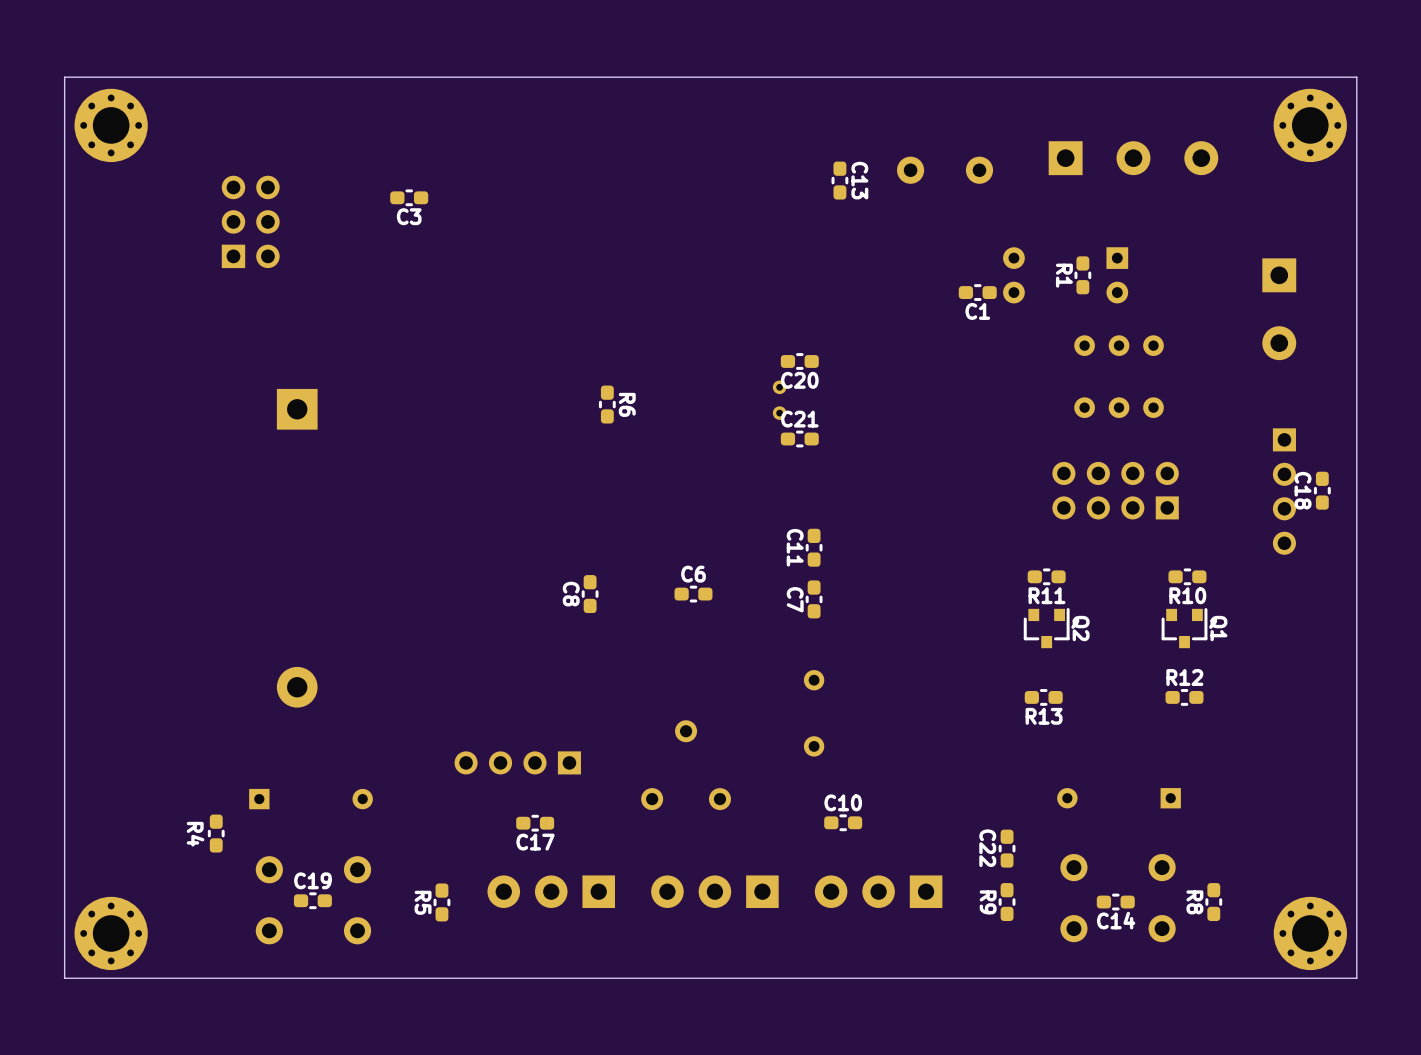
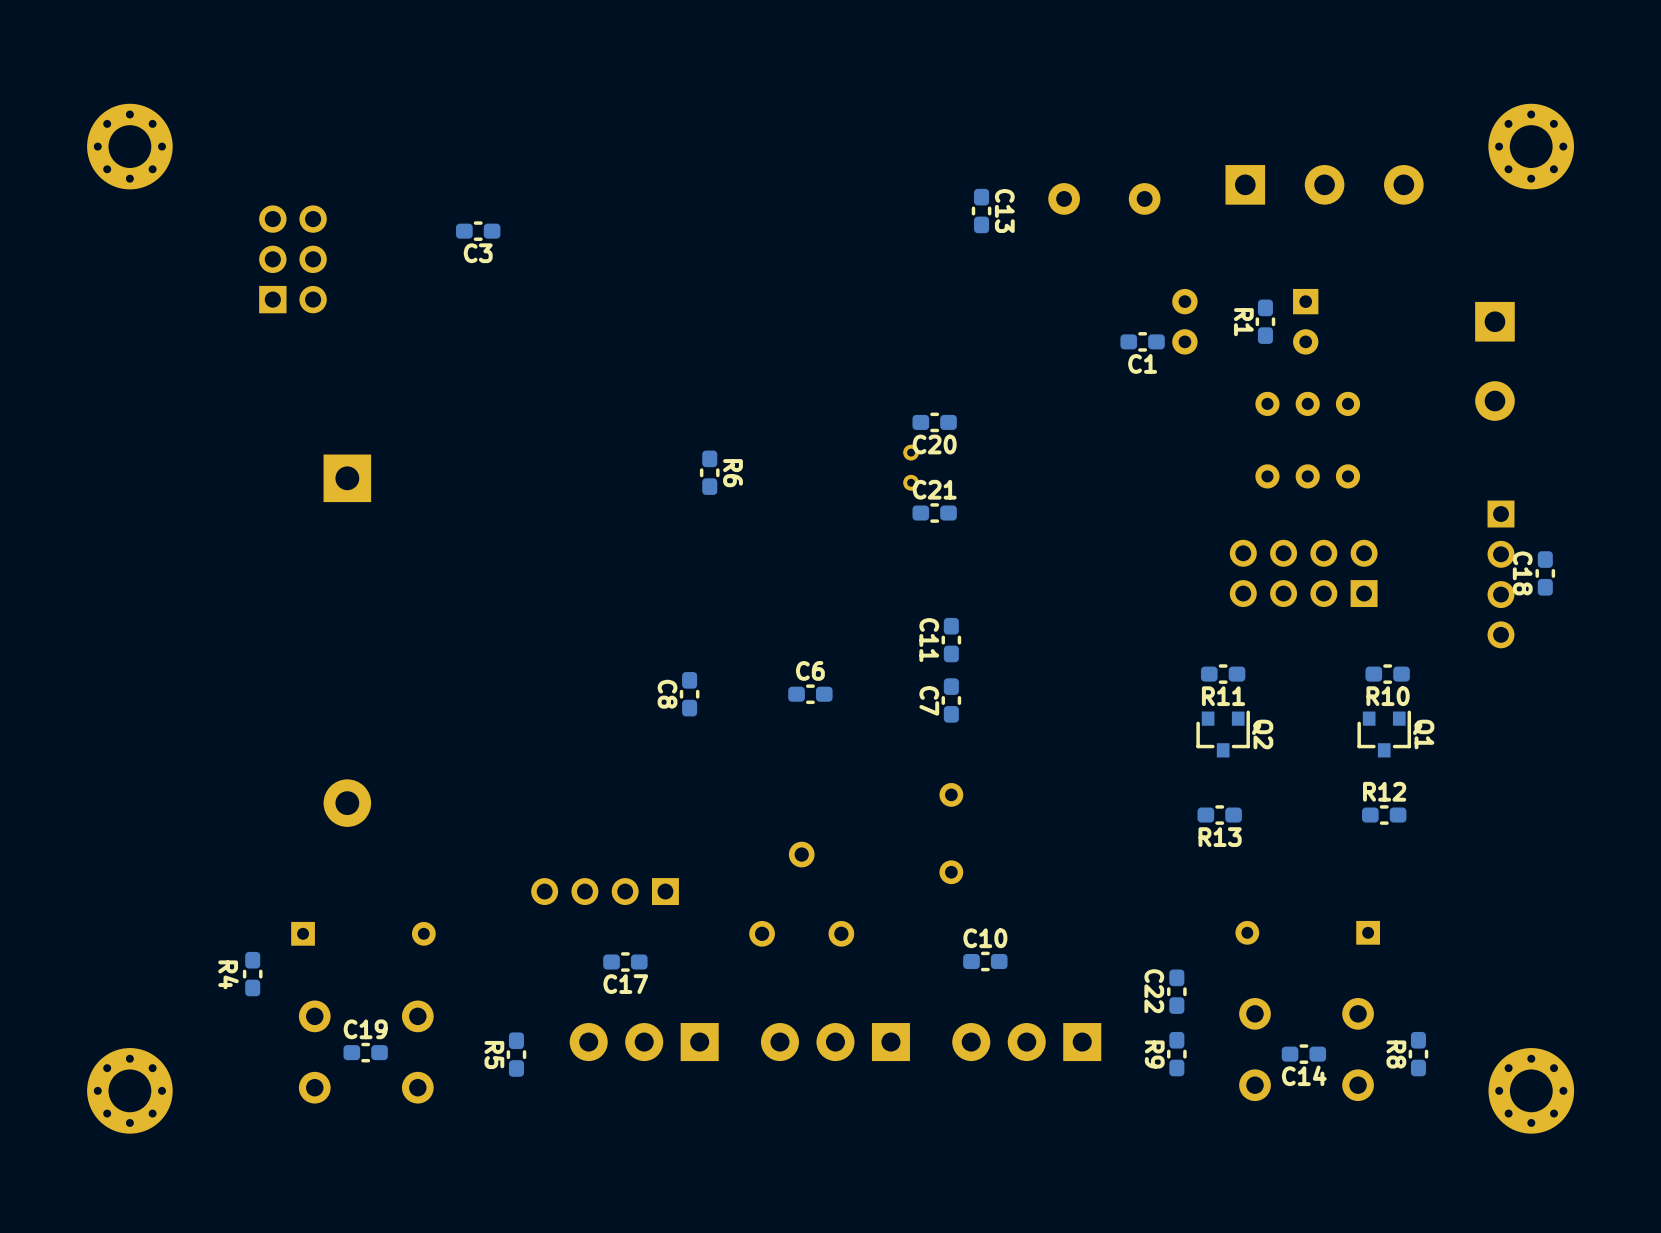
board edge: (1356, 77) (64, 77) (64, 978) (1356, 978) (1356, 77) -> none

